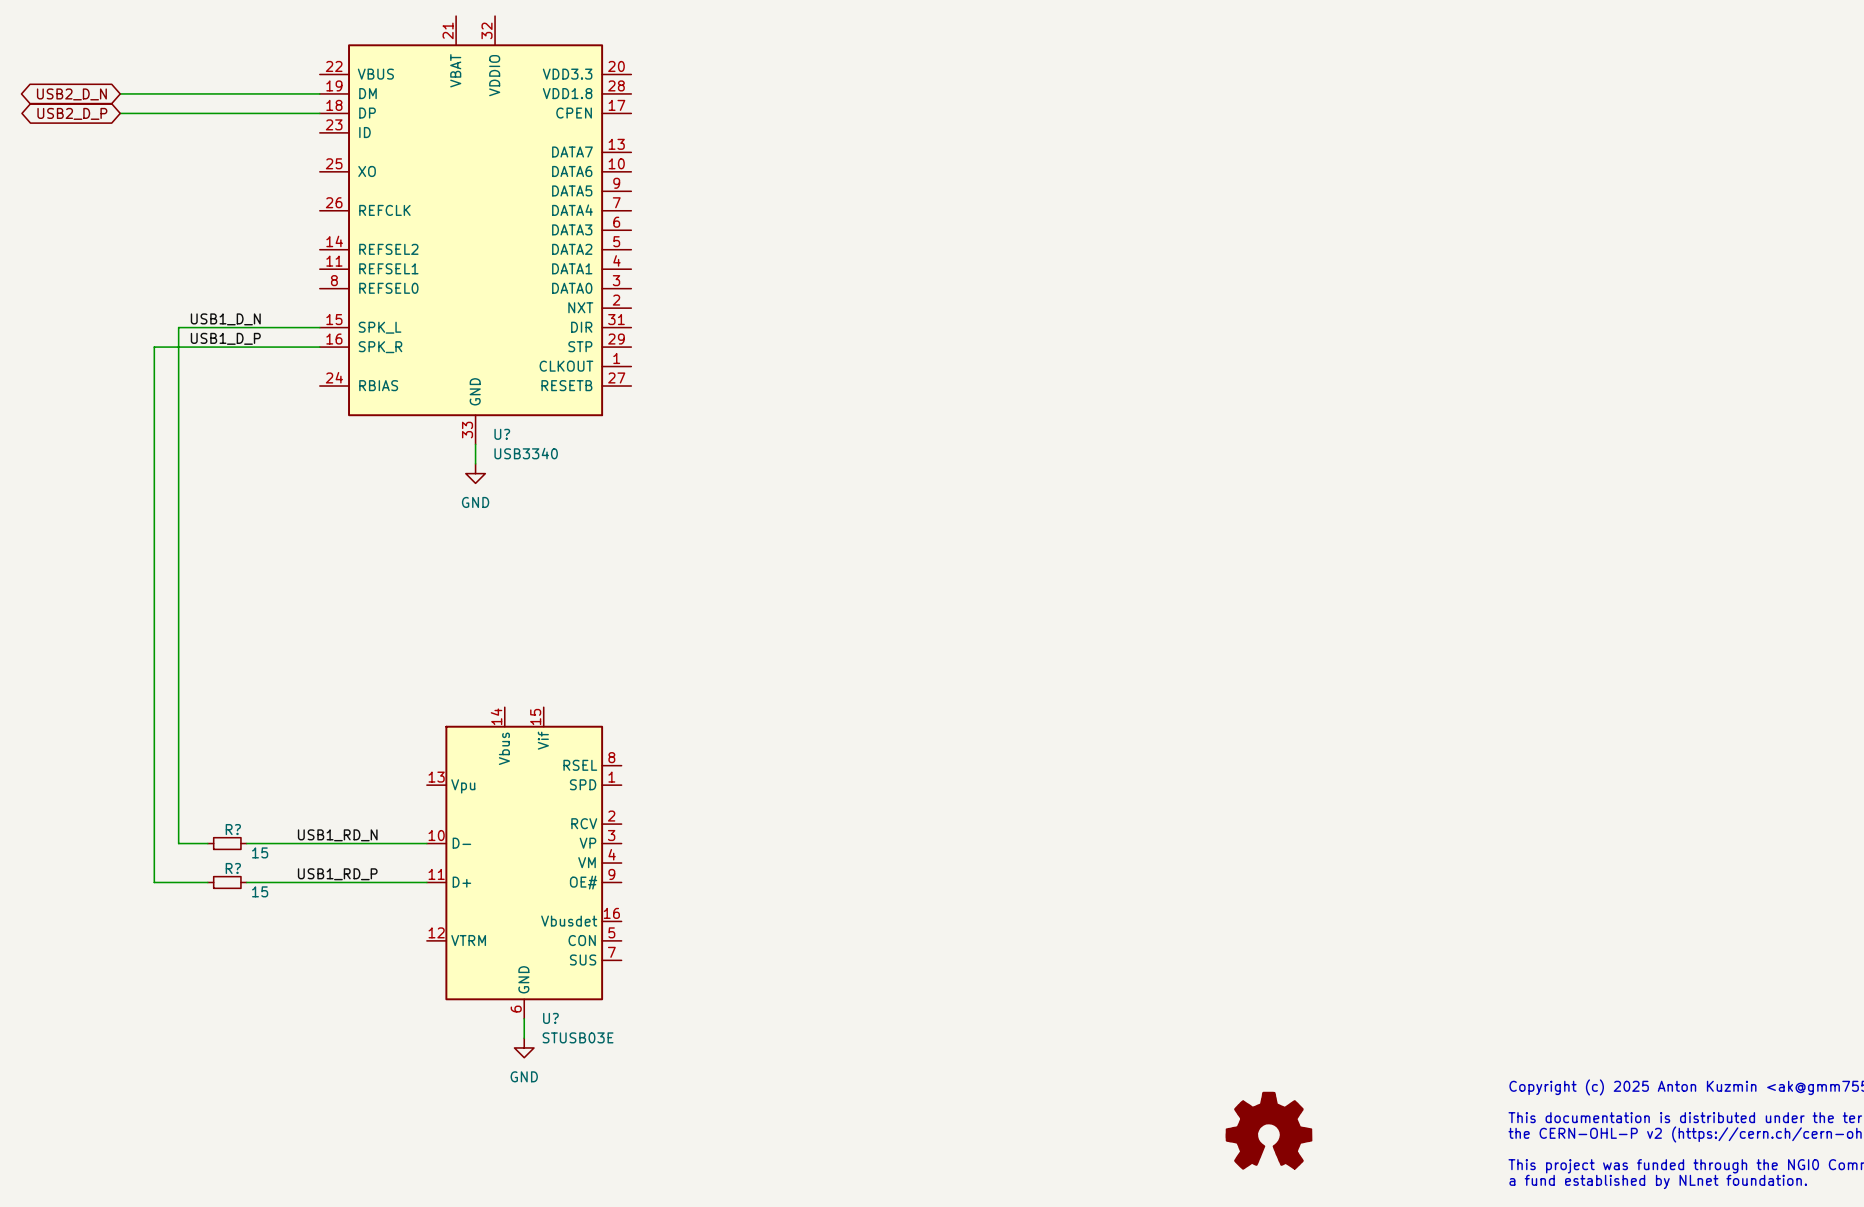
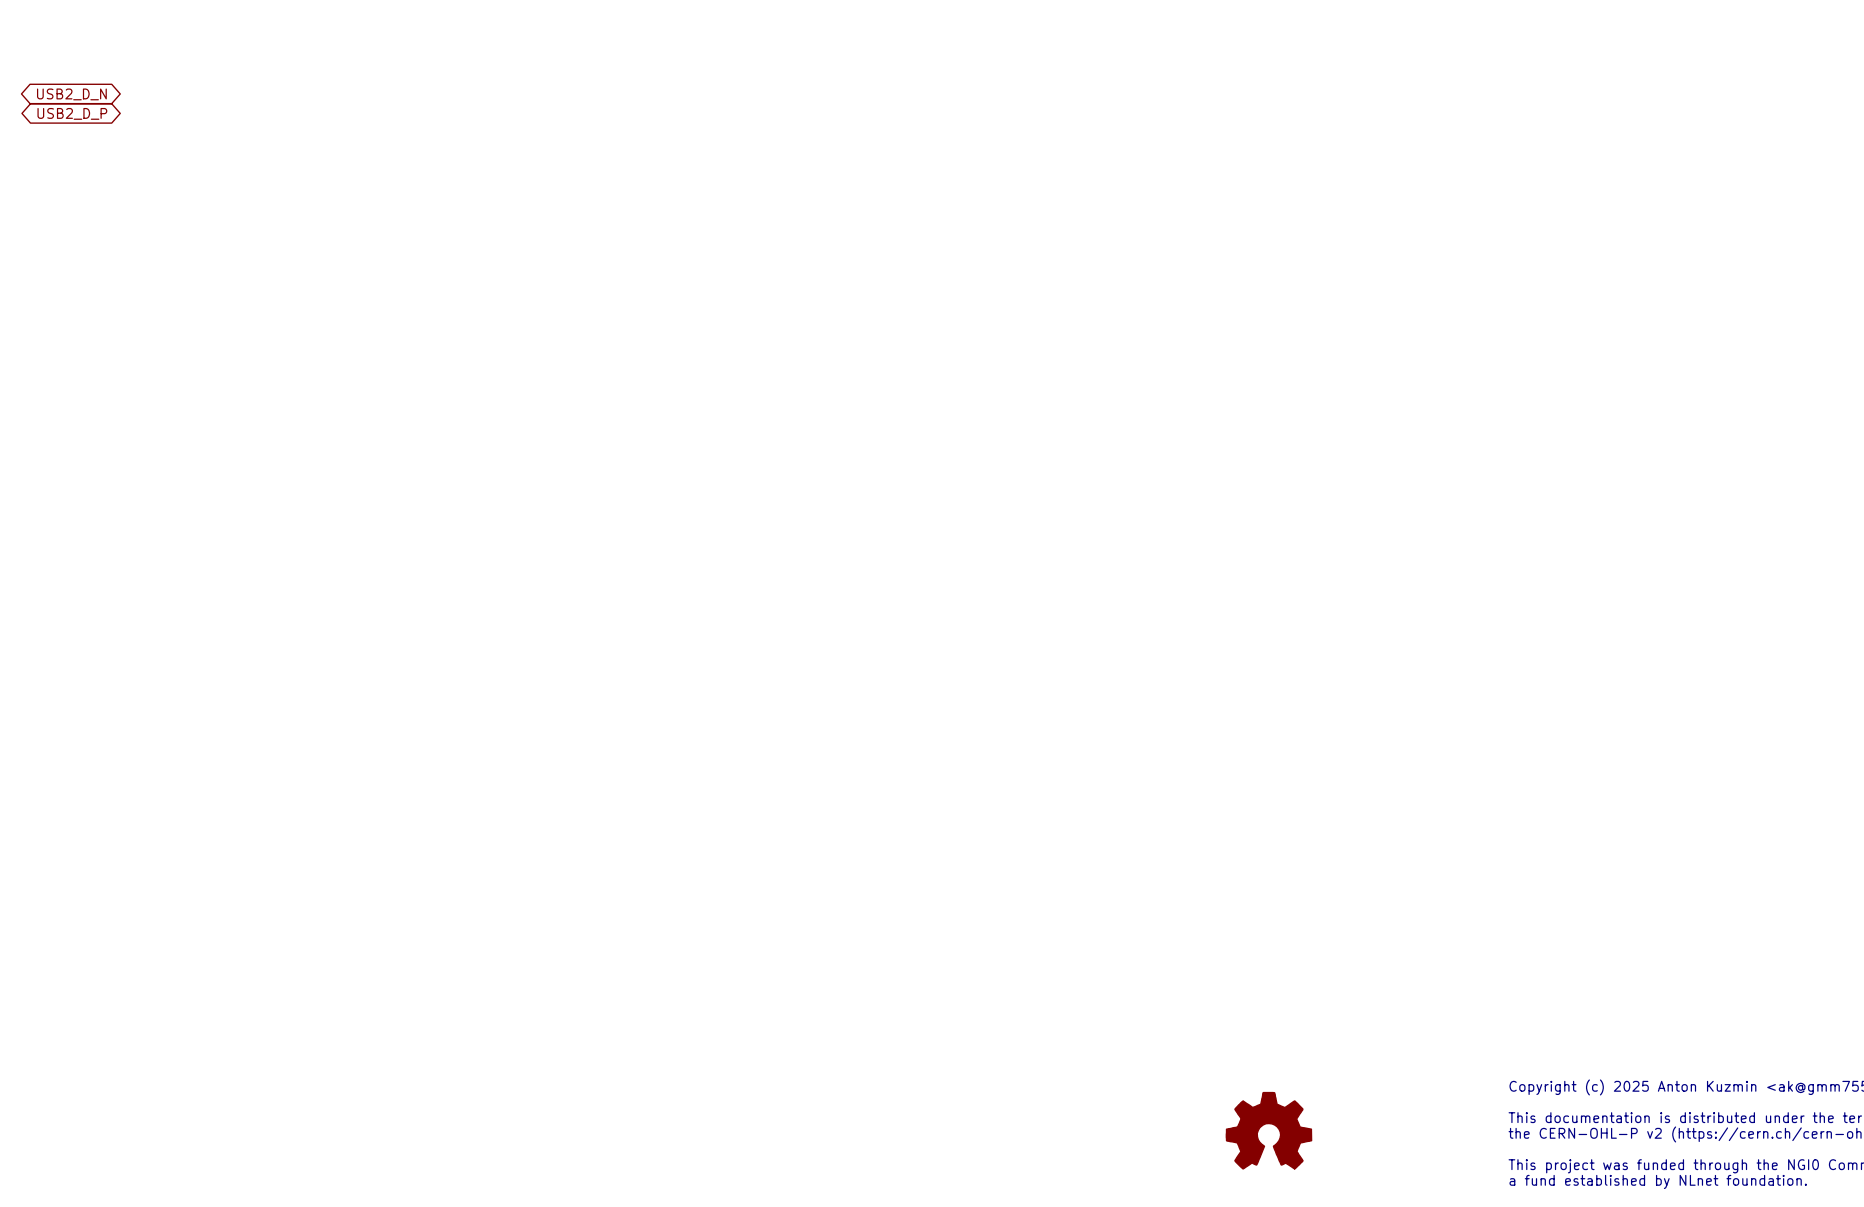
wire: (120, 93) (319, 93) -> none
wire: (120, 113) (319, 113) -> none
U?: USB3340 (475, 230) -> none
label: USB1_D_N (225, 319) -> none
wire: (319, 327) (178, 327) (178, 843) (207, 843) -> none
label: USB1_D_P (225, 338) -> none
wire: (319, 347) (154, 347) (154, 882) (207, 882) -> none
wire: (475, 444) (475, 463) -> none
power symbol: GND (475, 473) -> none
label: USB1_RD_N (337, 835) -> none
R?: 15 (227, 843) -> none
wire: (246, 843) (426, 843) -> none
U?: STUSB03E (524, 863) -> none
label: USB1_RD_P (337, 874) -> none
R?: 15 (227, 882) -> none
wire: (246, 882) (426, 882) -> none
wire: (524, 1018) (524, 1038) -> none
power symbol: GND (524, 1047) -> none

